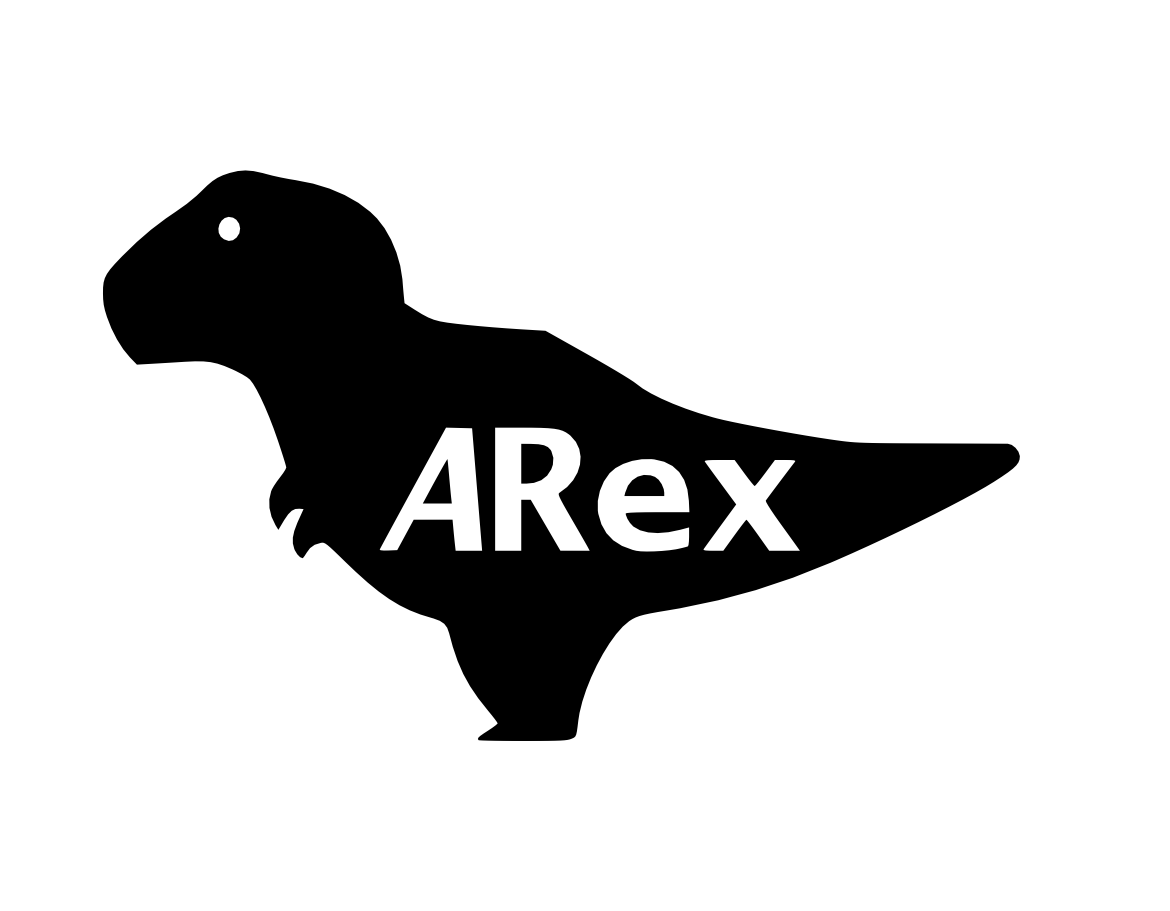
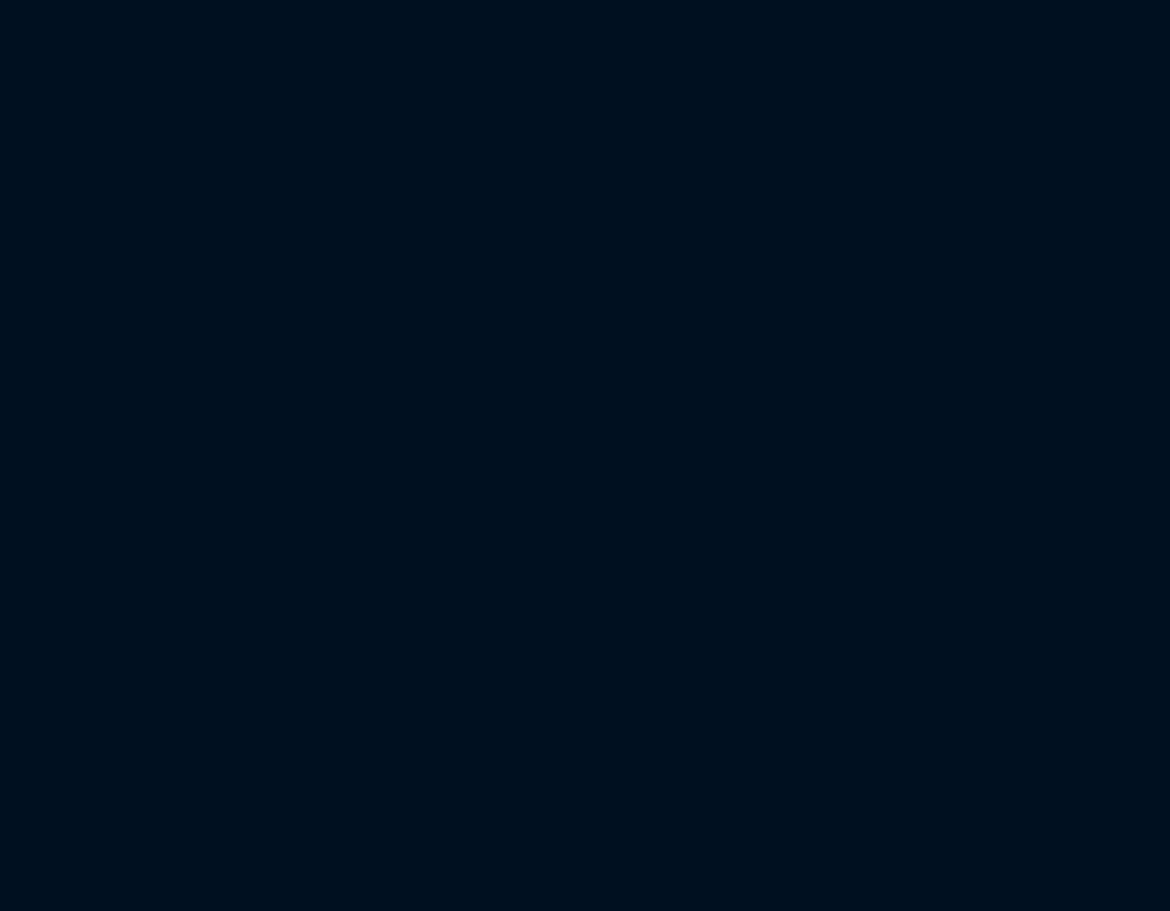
drawing: [102, 170, 1020, 741] -> none

